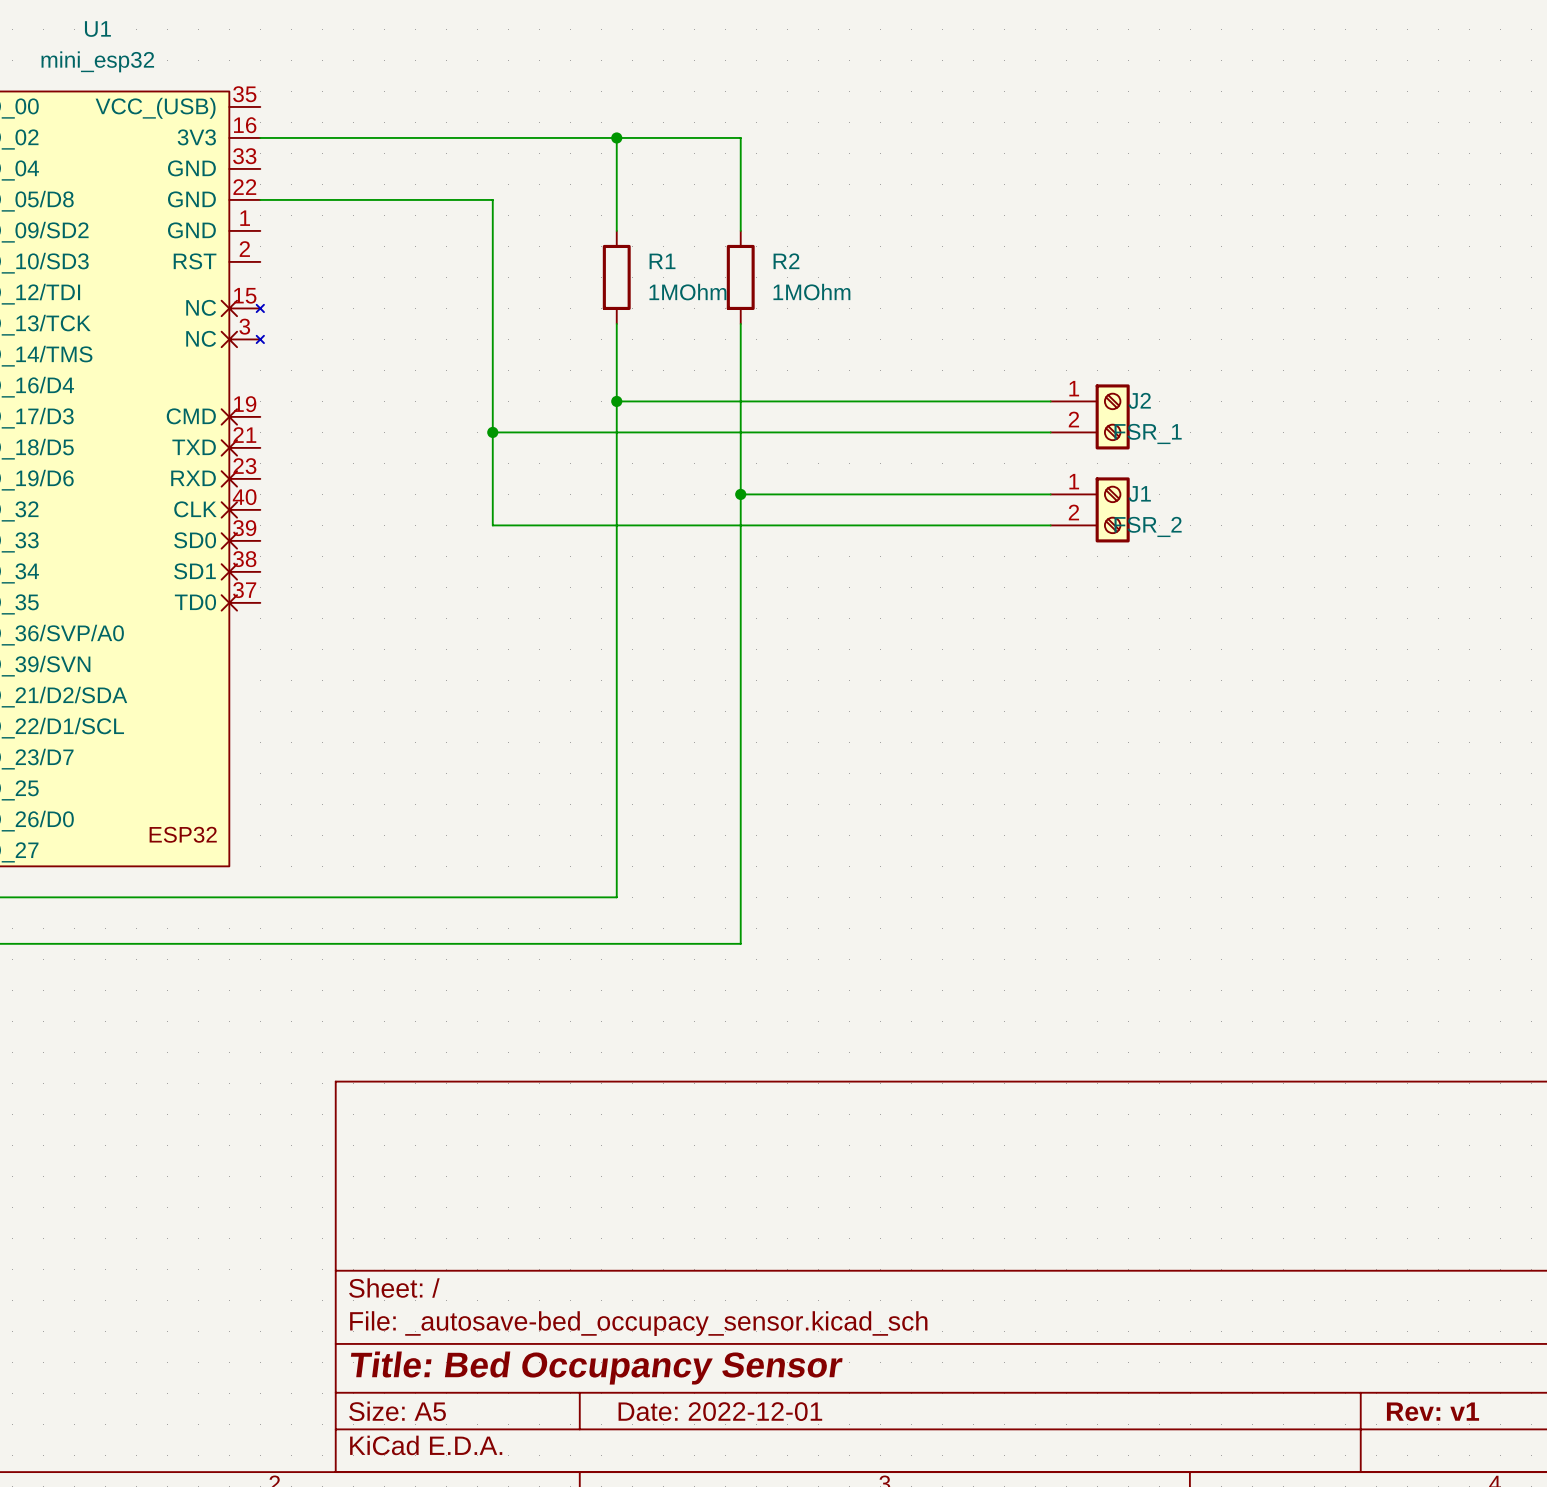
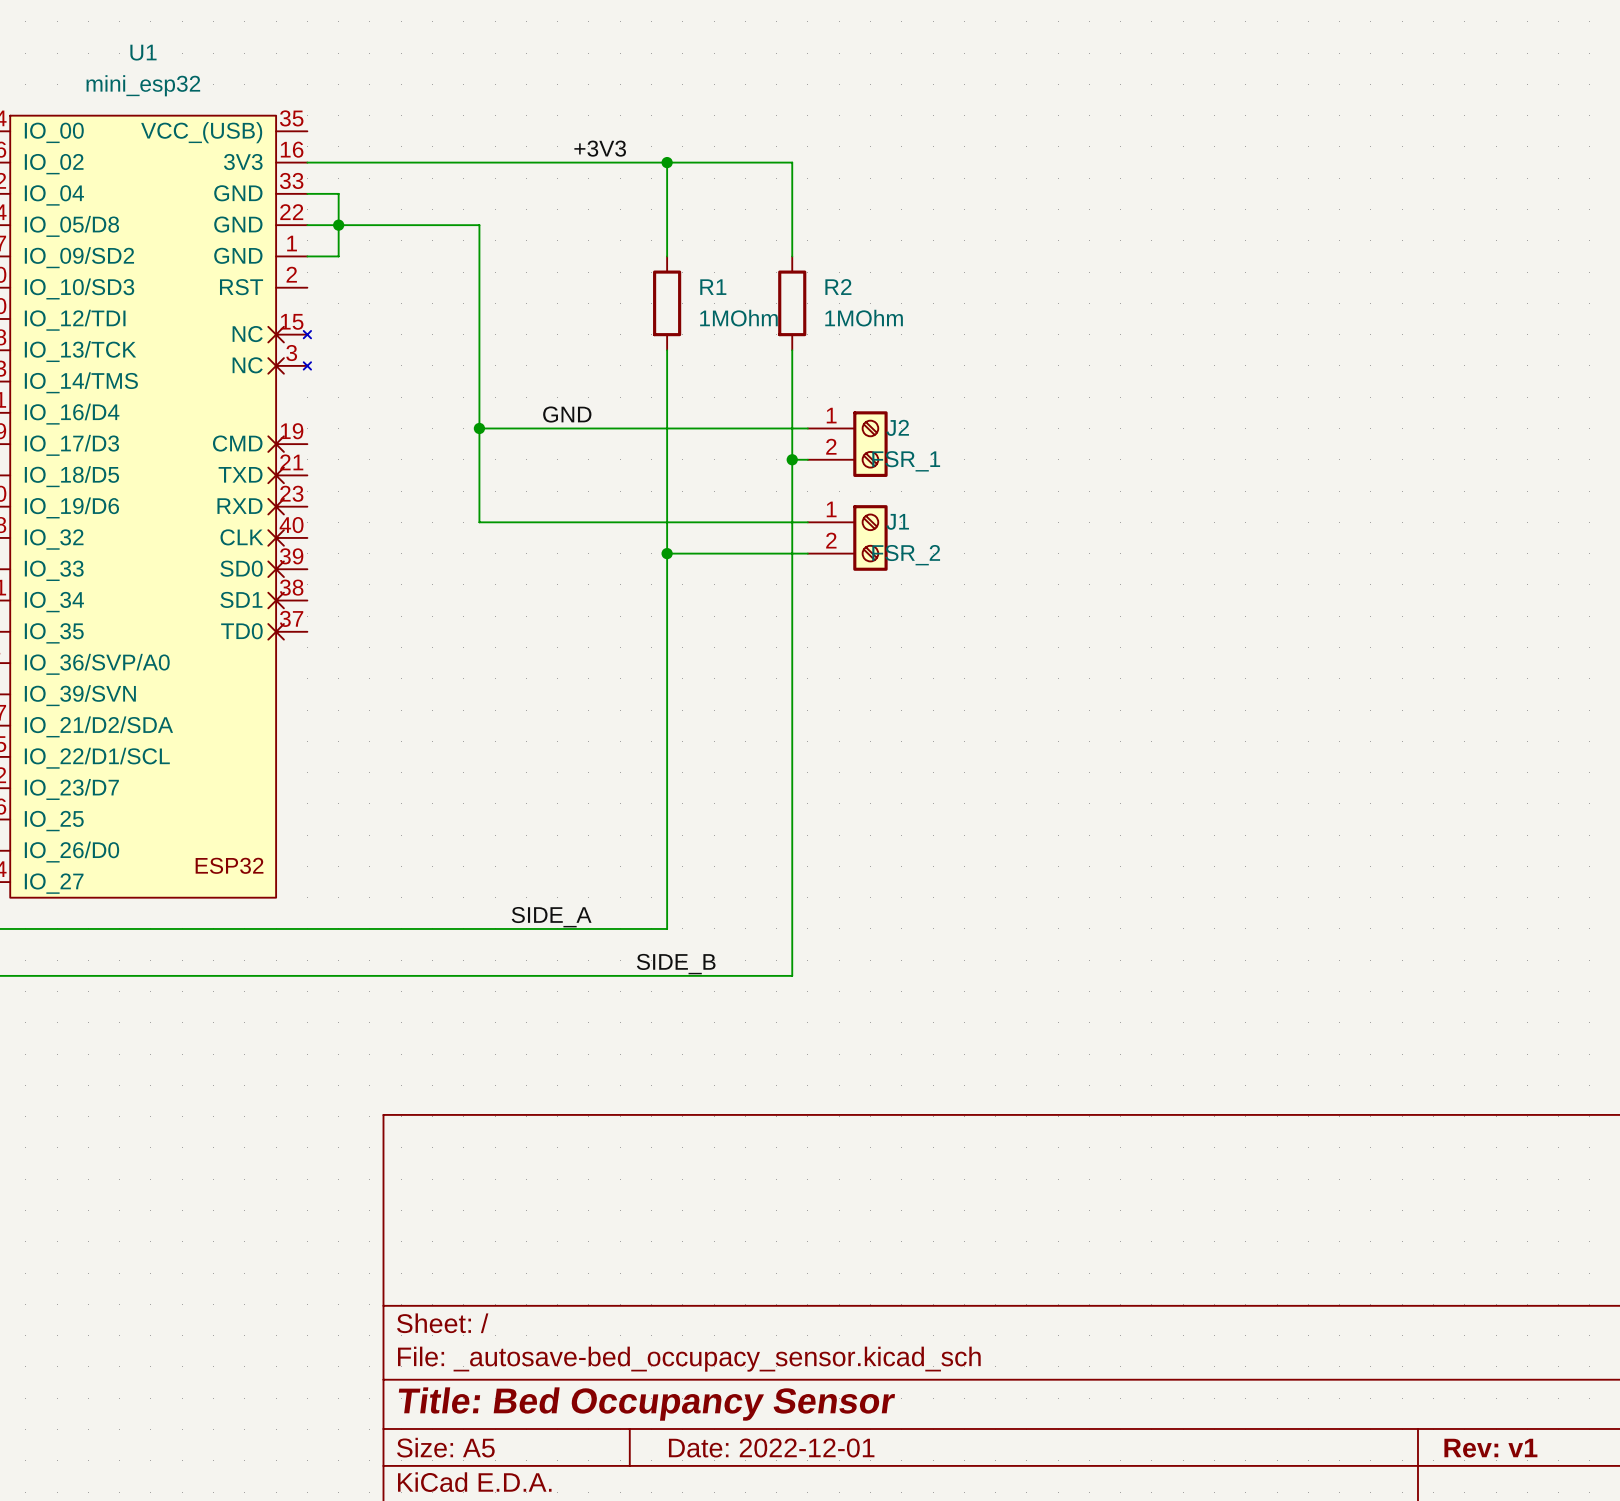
label: none -> +3V3 (600, 148)
wire: none -> (307, 193) (338, 193) (338, 256) (307, 256)
junction: none -> (338, 225)
wire: (430, 199) (492, 199) (492, 525) (616, 525) -> (479, 225) (479, 522) (792, 522)
label: none -> GND (567, 414)
wire: none -> (479, 428) (667, 428)
junction: (616, 401) -> none
wire: (756, 401) (1050, 401) -> none
J2 position: (1090, 416) -> (847, 444)
wire: (492, 432) (740, 432) -> none
junction position: (492, 432) -> (479, 428)
wire: (756, 432) (1050, 432) -> none
junction position: (740, 494) -> (792, 459)
wire: (756, 494) (1050, 494) -> none
J1 position: (1090, 509) -> (847, 537)
junction: none -> (667, 553)
wire: (756, 525) (1050, 525) -> none
label: none -> SIDE_A (551, 917)
label: none -> SIDE_B (676, 964)

